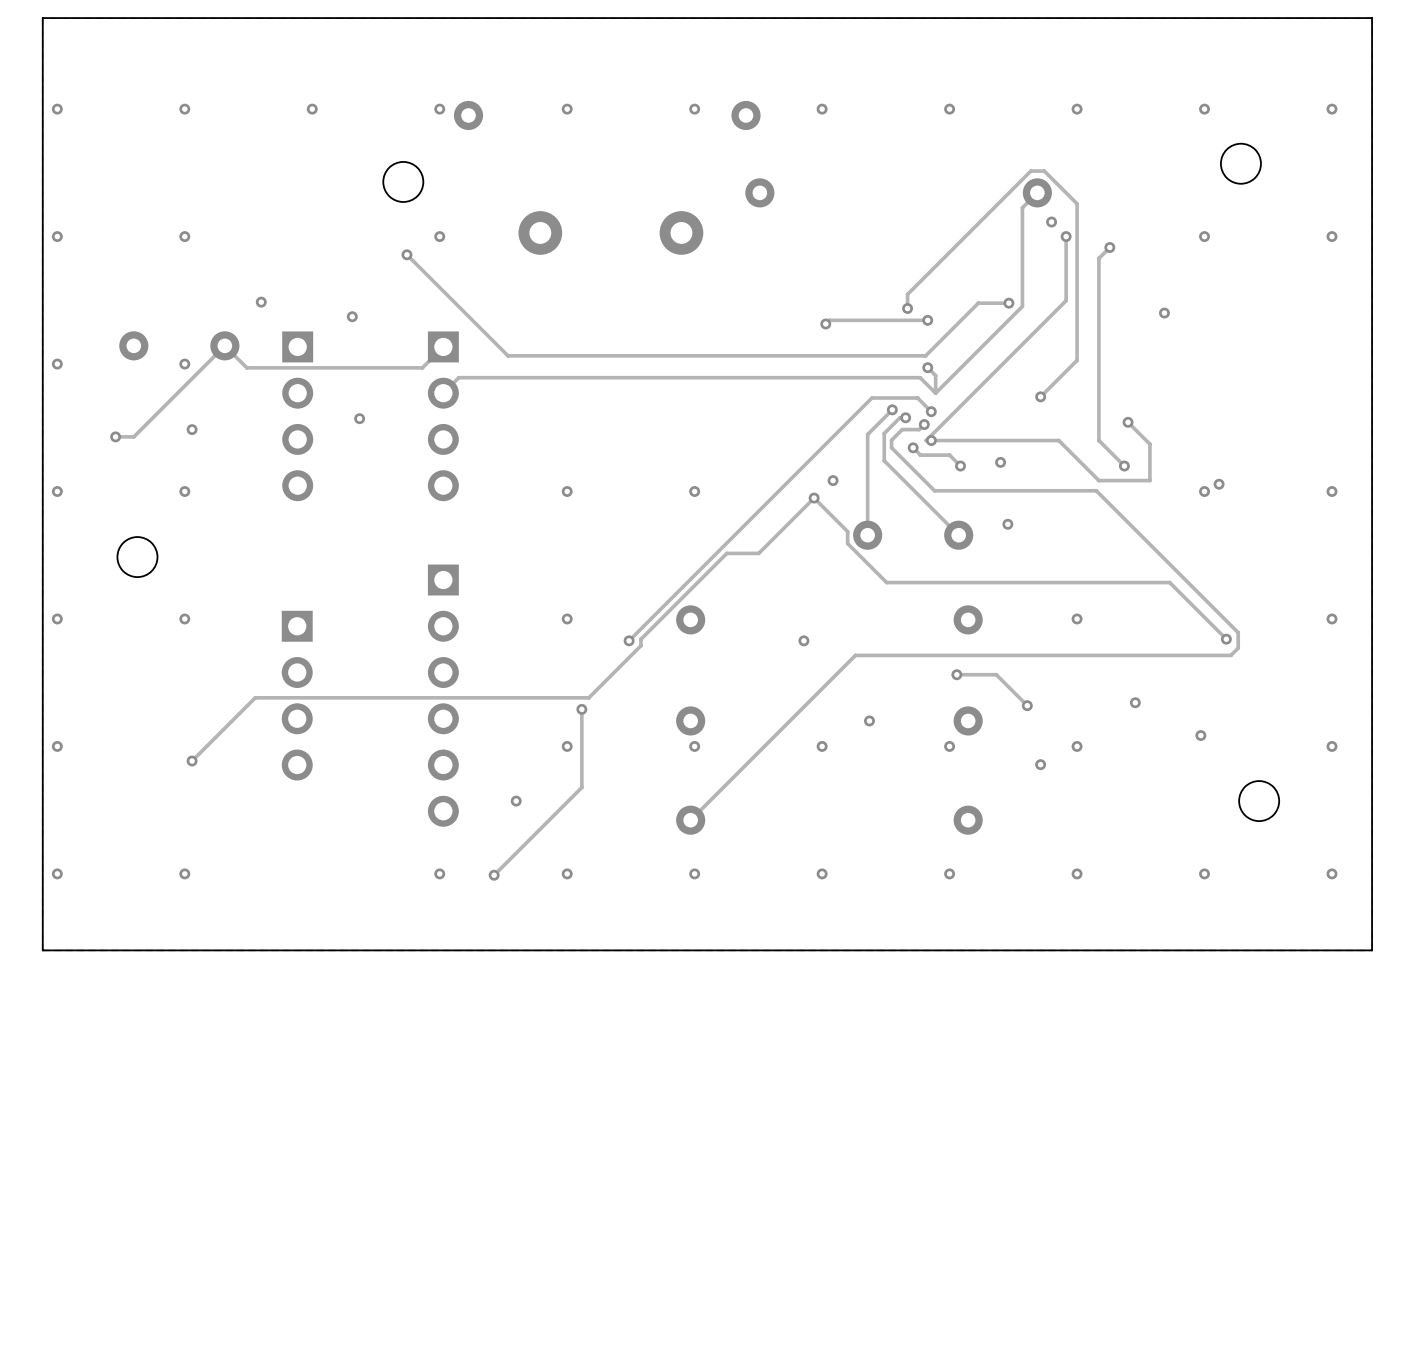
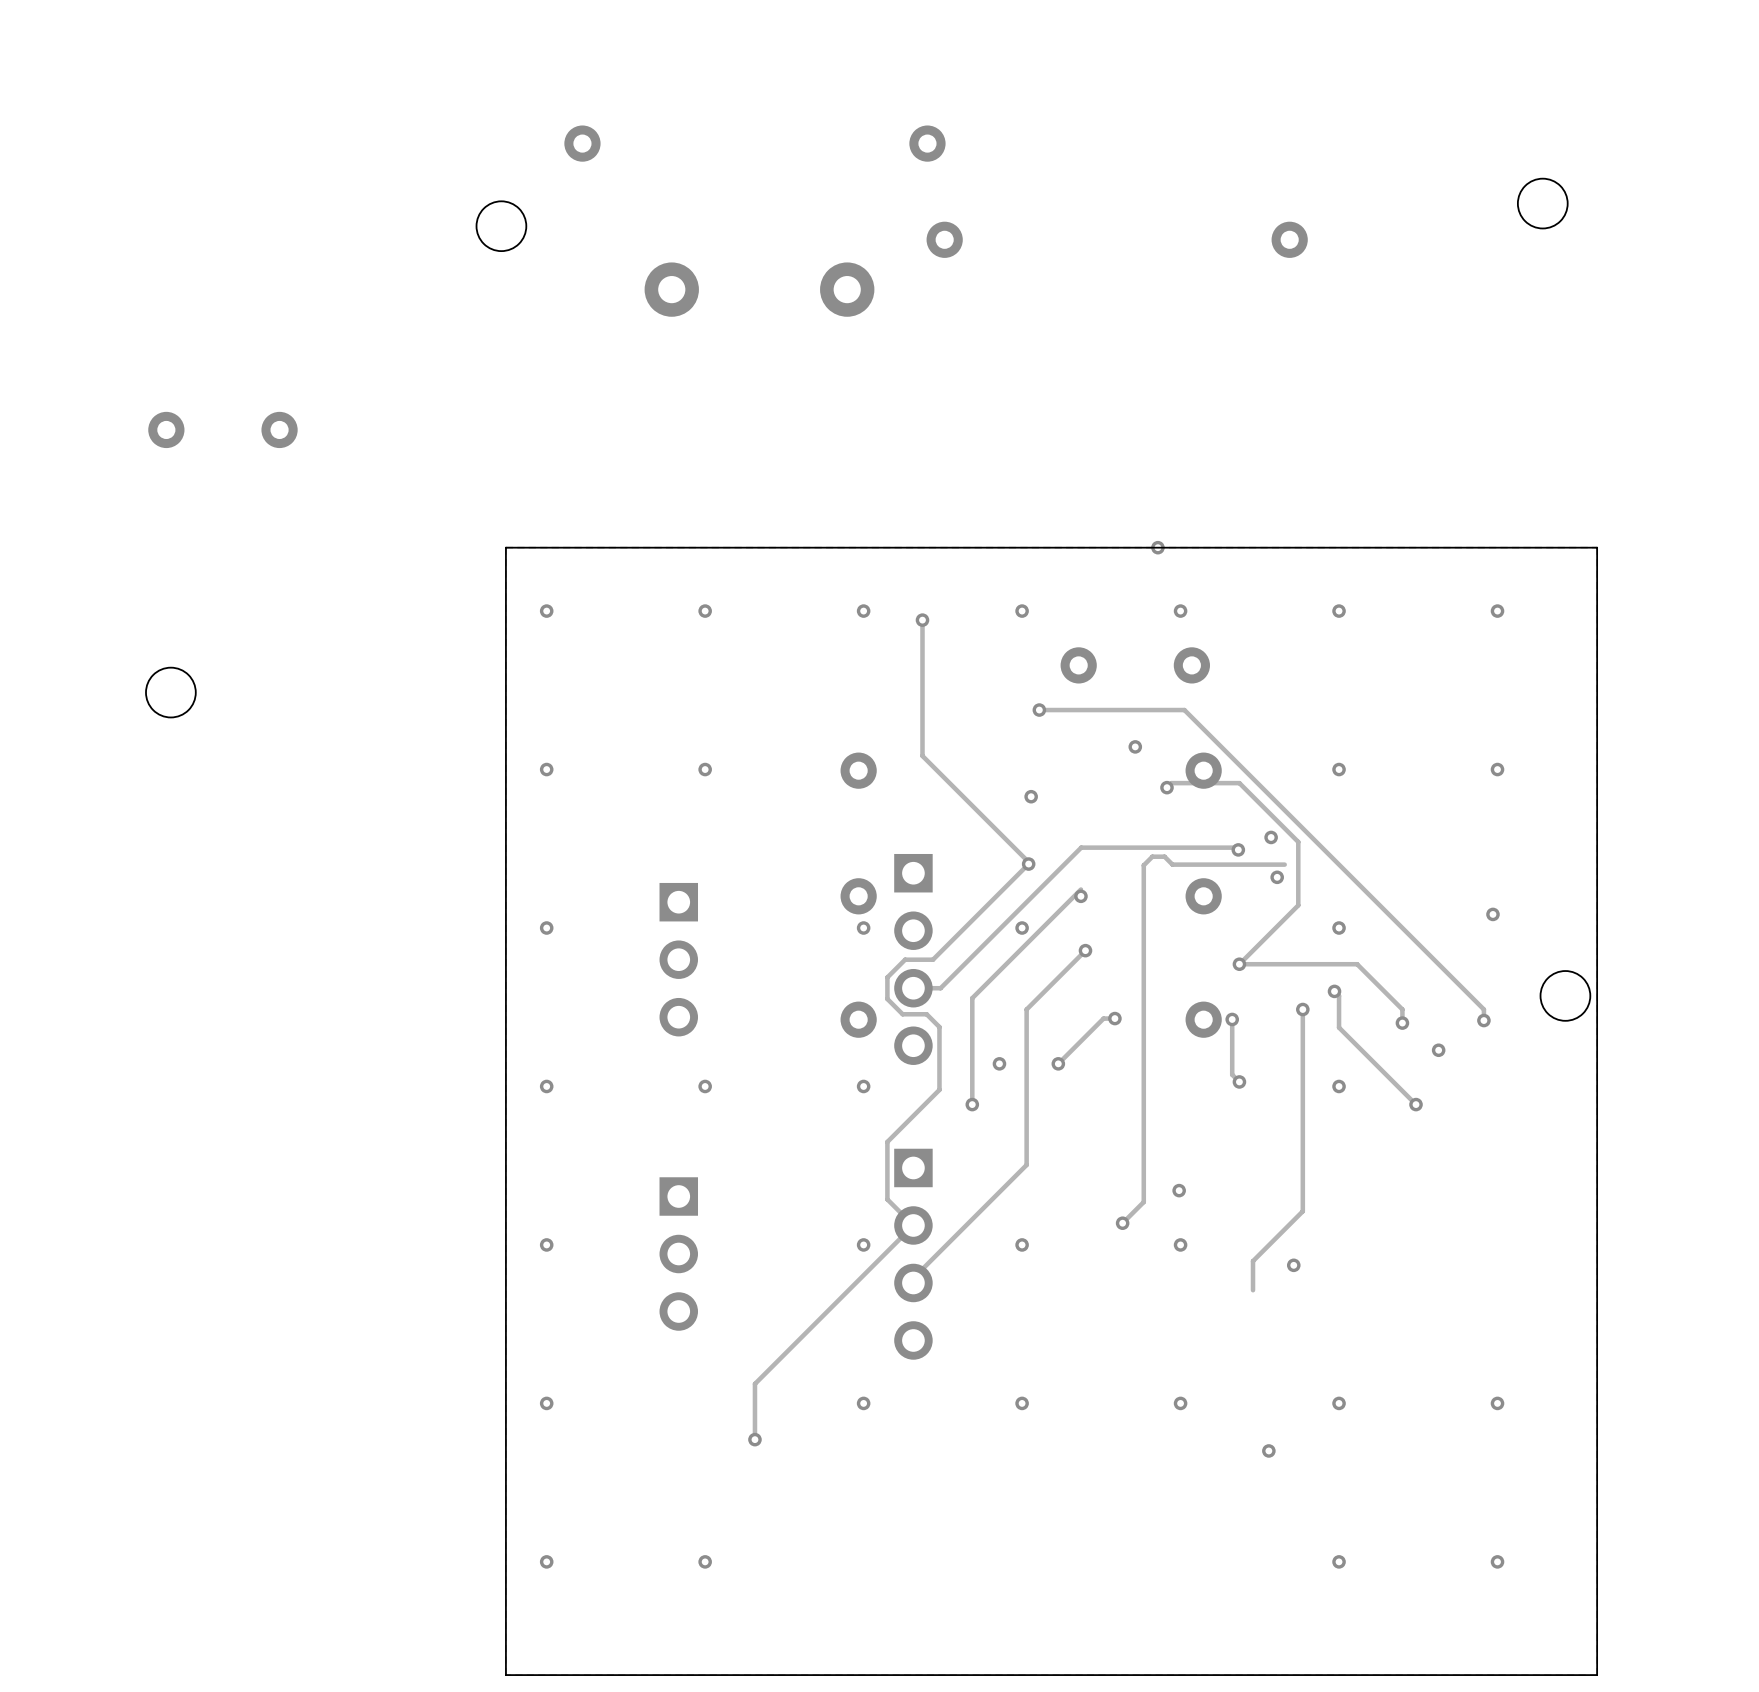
board edge: (1372, 18) (42, 18) (42, 950) (1372, 950) (1372, 18) -> none
via: (57, 109) -> none
via: (184, 109) -> none
via: (312, 109) -> none
via: (439, 109) -> none
via: (567, 109) -> none
via: (694, 109) -> none
via: (822, 109) -> none
via: (949, 109) -> none
via: (1077, 109) -> none
via: (1204, 109) -> none
via: (1331, 109) -> none
track: (1037, 192) (1022, 207) (1022, 306) (935, 393) -> none
via: (1051, 222) -> none
via: (57, 236) -> none
via: (184, 236) -> none
via: (439, 236) -> none
track: (1066, 236) (1066, 300) (926, 440) (1058, 440) (1098, 480) (1149, 480) (1149, 444) (1128, 422) -> none
via: (1066, 236) -> none
via: (1204, 236) -> none
via: (1331, 236) -> none
track: (1109, 247) (1098, 258) (1098, 440) (1124, 466) -> none
via: (1109, 247) -> none
track: (406, 254) (508, 355) (925, 355) (978, 303) (1008, 303) -> none
via: (406, 254) -> none
via: (261, 302) -> none
via: (1008, 303) -> none
track: (907, 308) (907, 294) (1030, 171) (1044, 171) (1077, 203) (1077, 360) (1040, 396) -> none
via: (907, 308) -> none
via: (1164, 313) -> none
via: (352, 316) -> none
track: (927, 320) (829, 320) (825, 323) -> none
via: (927, 320) -> none
via: (825, 323) -> none
track: (443, 346) (422, 367) (246, 367) (224, 345) (133, 436) (115, 436) -> none
via: (57, 364) -> none
via: (184, 364) -> none
track: (927, 367) (935, 375) (935, 393) -> none
via: (927, 367) -> none
track: (935, 393) (920, 377) (458, 377) (443, 393) -> none
via: (1040, 396) -> none
track: (892, 409) (867, 434) (867, 535) -> none
via: (892, 409) -> none
track: (931, 411) (917, 397) (871, 397) (629, 640) -> none
via: (931, 411) -> none
part: (297, 416) -> none
part: (443, 416) -> none
track: (905, 417) (900, 417) (884, 433) (884, 460) (958, 535) -> none
via: (905, 417) -> none
via: (359, 418) -> none
via: (1128, 422) -> none
track: (924, 424) (919, 429) (902, 429) (891, 440) (891, 447) (934, 490) (1096, 490) (1238, 632) (1238, 648) (1230, 655) (855, 655) (690, 820) -> none
via: (924, 424) -> none
via: (192, 429) -> none
via: (115, 436) -> none
board edge: none -> (1597, 547) (505, 547) (505, 1675) (1597, 1675) (1597, 547)
track: (913, 447) (920, 455) (949, 455) (960, 466) -> none
via: (913, 447) -> none
via: (1000, 462) -> none
via position: (960, 466) -> (1180, 611)
via: (1124, 466) -> none
via: (833, 480) -> none
via: (1219, 484) -> none
via: (57, 491) -> none
via: (184, 491) -> none
via: none -> (546, 611)
via: none -> (1022, 611)
via: none -> (1339, 611)
via: (1331, 491) -> none
track: none -> (922, 620) (922, 755) (1031, 864)
via: none -> (922, 620)
via: (814, 498) -> none
via: (1007, 524) -> none
track: none -> (1039, 710) (1184, 710) (1483, 1009) (1483, 1020)
via: none -> (1039, 710)
via: none -> (1135, 746)
via: (57, 618) -> none
via: (184, 618) -> none
via: none -> (546, 769)
via: (1331, 618) -> none
track: none -> (1166, 787) (1171, 783) (1239, 783) (1298, 841) (1298, 905) (1239, 964) (1357, 964) (1402, 1009) (1402, 1023)
via: none -> (1166, 787)
track: (1226, 639) (1169, 582) (886, 582) (847, 543) (847, 531) (814, 498) (758, 553) (726, 553) (640, 639) (640, 645) (588, 697) (255, 697) (192, 761) -> none
via position: (1226, 639) -> (1497, 769)
via: (629, 640) -> none
via position: (803, 640) -> (1031, 796)
via: none -> (1271, 837)
track: (956, 674) (996, 674) (1027, 705) -> none
via: (956, 674) -> none
track: none -> (1238, 849) (1236, 847) (1081, 847) (940, 988) (913, 988)
via: none -> (1238, 849)
part: (297, 695) -> none
part: (443, 695) -> none
track: none -> (1028, 864) (933, 959) (905, 959) (887, 977) (887, 999) (902, 1014) (926, 1014) (939, 1027) (939, 1089) (887, 1141) (887, 1199) (913, 1225) (754, 1383) (754, 1439)
via: none -> (1028, 864)
track: none -> (1284, 864) (1172, 864) (1164, 856) (1152, 856) (1143, 865) (1143, 1202) (1122, 1223)
via: (1135, 702) -> none
track: (581, 709) (581, 787) (494, 875) -> none
via: (581, 709) -> none
track: none -> (1080, 889) (972, 998) (972, 1104)
via: (57, 746) -> none
via: none -> (546, 928)
via: (567, 746) -> none
via: (949, 746) -> none
via: (1331, 746) -> none
via: (192, 761) -> none
track: none -> (1085, 950) (1026, 1009) (1026, 1165) (913, 1278)
via: none -> (1085, 950)
via: (1040, 764) -> none
part: none -> (678, 959)
part: none -> (913, 959)
via: none -> (1239, 964)
track: none -> (1334, 991) (1339, 995) (1339, 1027) (1416, 1104)
via: none -> (1334, 991)
via: (516, 801) -> none
track: none -> (1302, 1009) (1302, 1211) (1253, 1261) (1253, 1290)
via: none -> (1302, 1009)
track: none -> (1114, 1018) (1103, 1018) (1058, 1063)
via: none -> (1114, 1018)
track: none -> (1232, 1019) (1232, 1074) (1239, 1081)
via: none -> (1232, 1019)
via: none -> (1483, 1020)
via: none -> (1402, 1023)
via: none -> (1438, 1050)
via: none -> (999, 1063)
via: none -> (1058, 1063)
via: none -> (1239, 1081)
via: (57, 873) -> none
via: (184, 873) -> none
via: (822, 873) -> none
via: (949, 873) -> none
via: (1204, 873) -> none
via: (1331, 873) -> none
via: (494, 875) -> none
via: none -> (972, 1104)
via: none -> (1416, 1104)
via: none -> (1179, 1190)
via: none -> (1122, 1223)
via: none -> (546, 1244)
via: none -> (863, 1244)
via: none -> (1022, 1244)
via: none -> (1180, 1244)
part: none -> (678, 1254)
part: none -> (913, 1254)
via: none -> (1293, 1265)
via: none -> (546, 1403)
via: none -> (863, 1403)
via: none -> (1022, 1403)
via: none -> (1180, 1403)
via: none -> (1339, 1403)
via: none -> (1497, 1403)
via: none -> (754, 1439)
via: none -> (1268, 1450)
via: none -> (546, 1561)
via: none -> (705, 1561)
via: none -> (1339, 1561)
via: none -> (1497, 1561)

